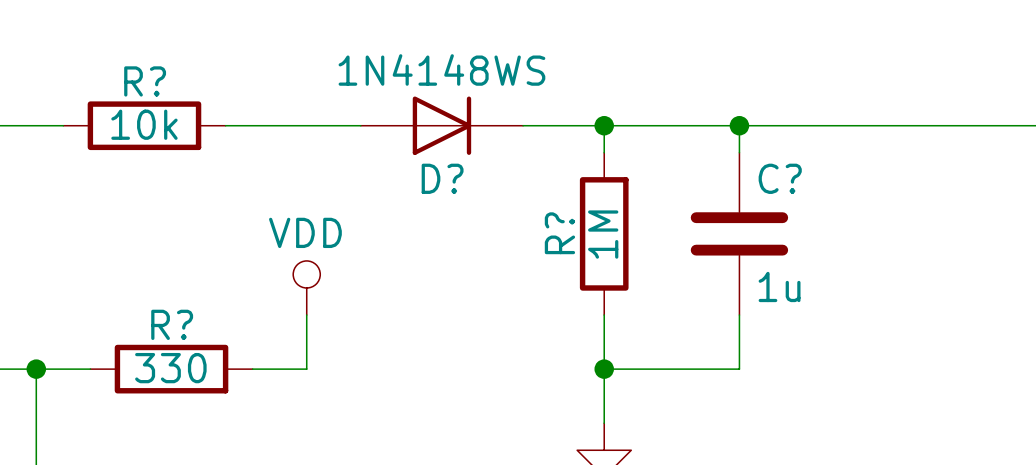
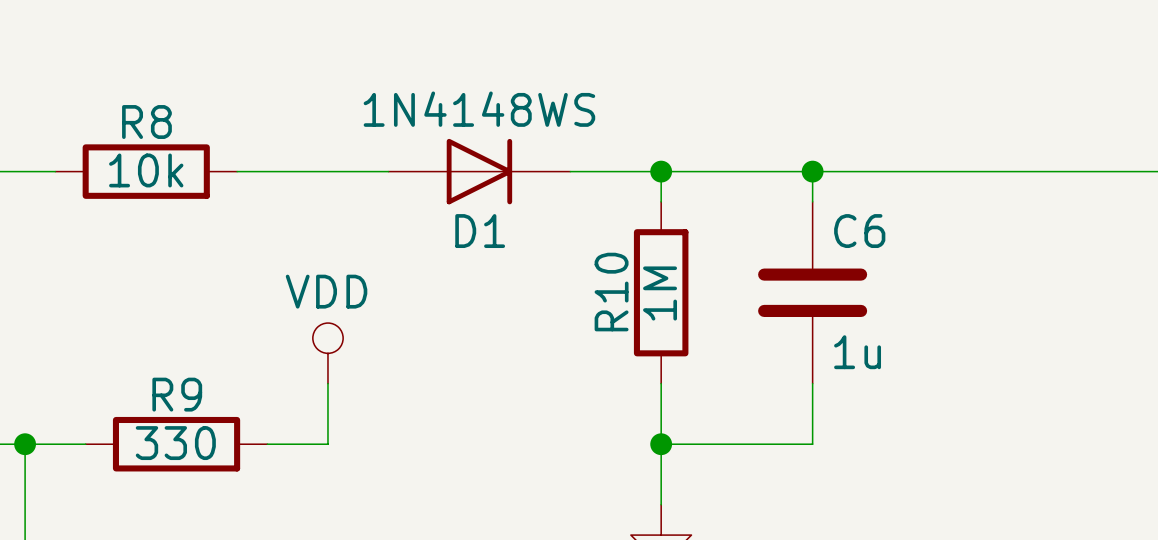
R? name: R? (145, 81) -> R8 (146, 122)
D? name: D? (442, 178) -> D1 (480, 231)
C? name: C? (780, 178) -> C6 (859, 231)
R? name: R? (559, 233) -> R10 (611, 292)
R? name: R? (172, 324) -> R9 (177, 394)

